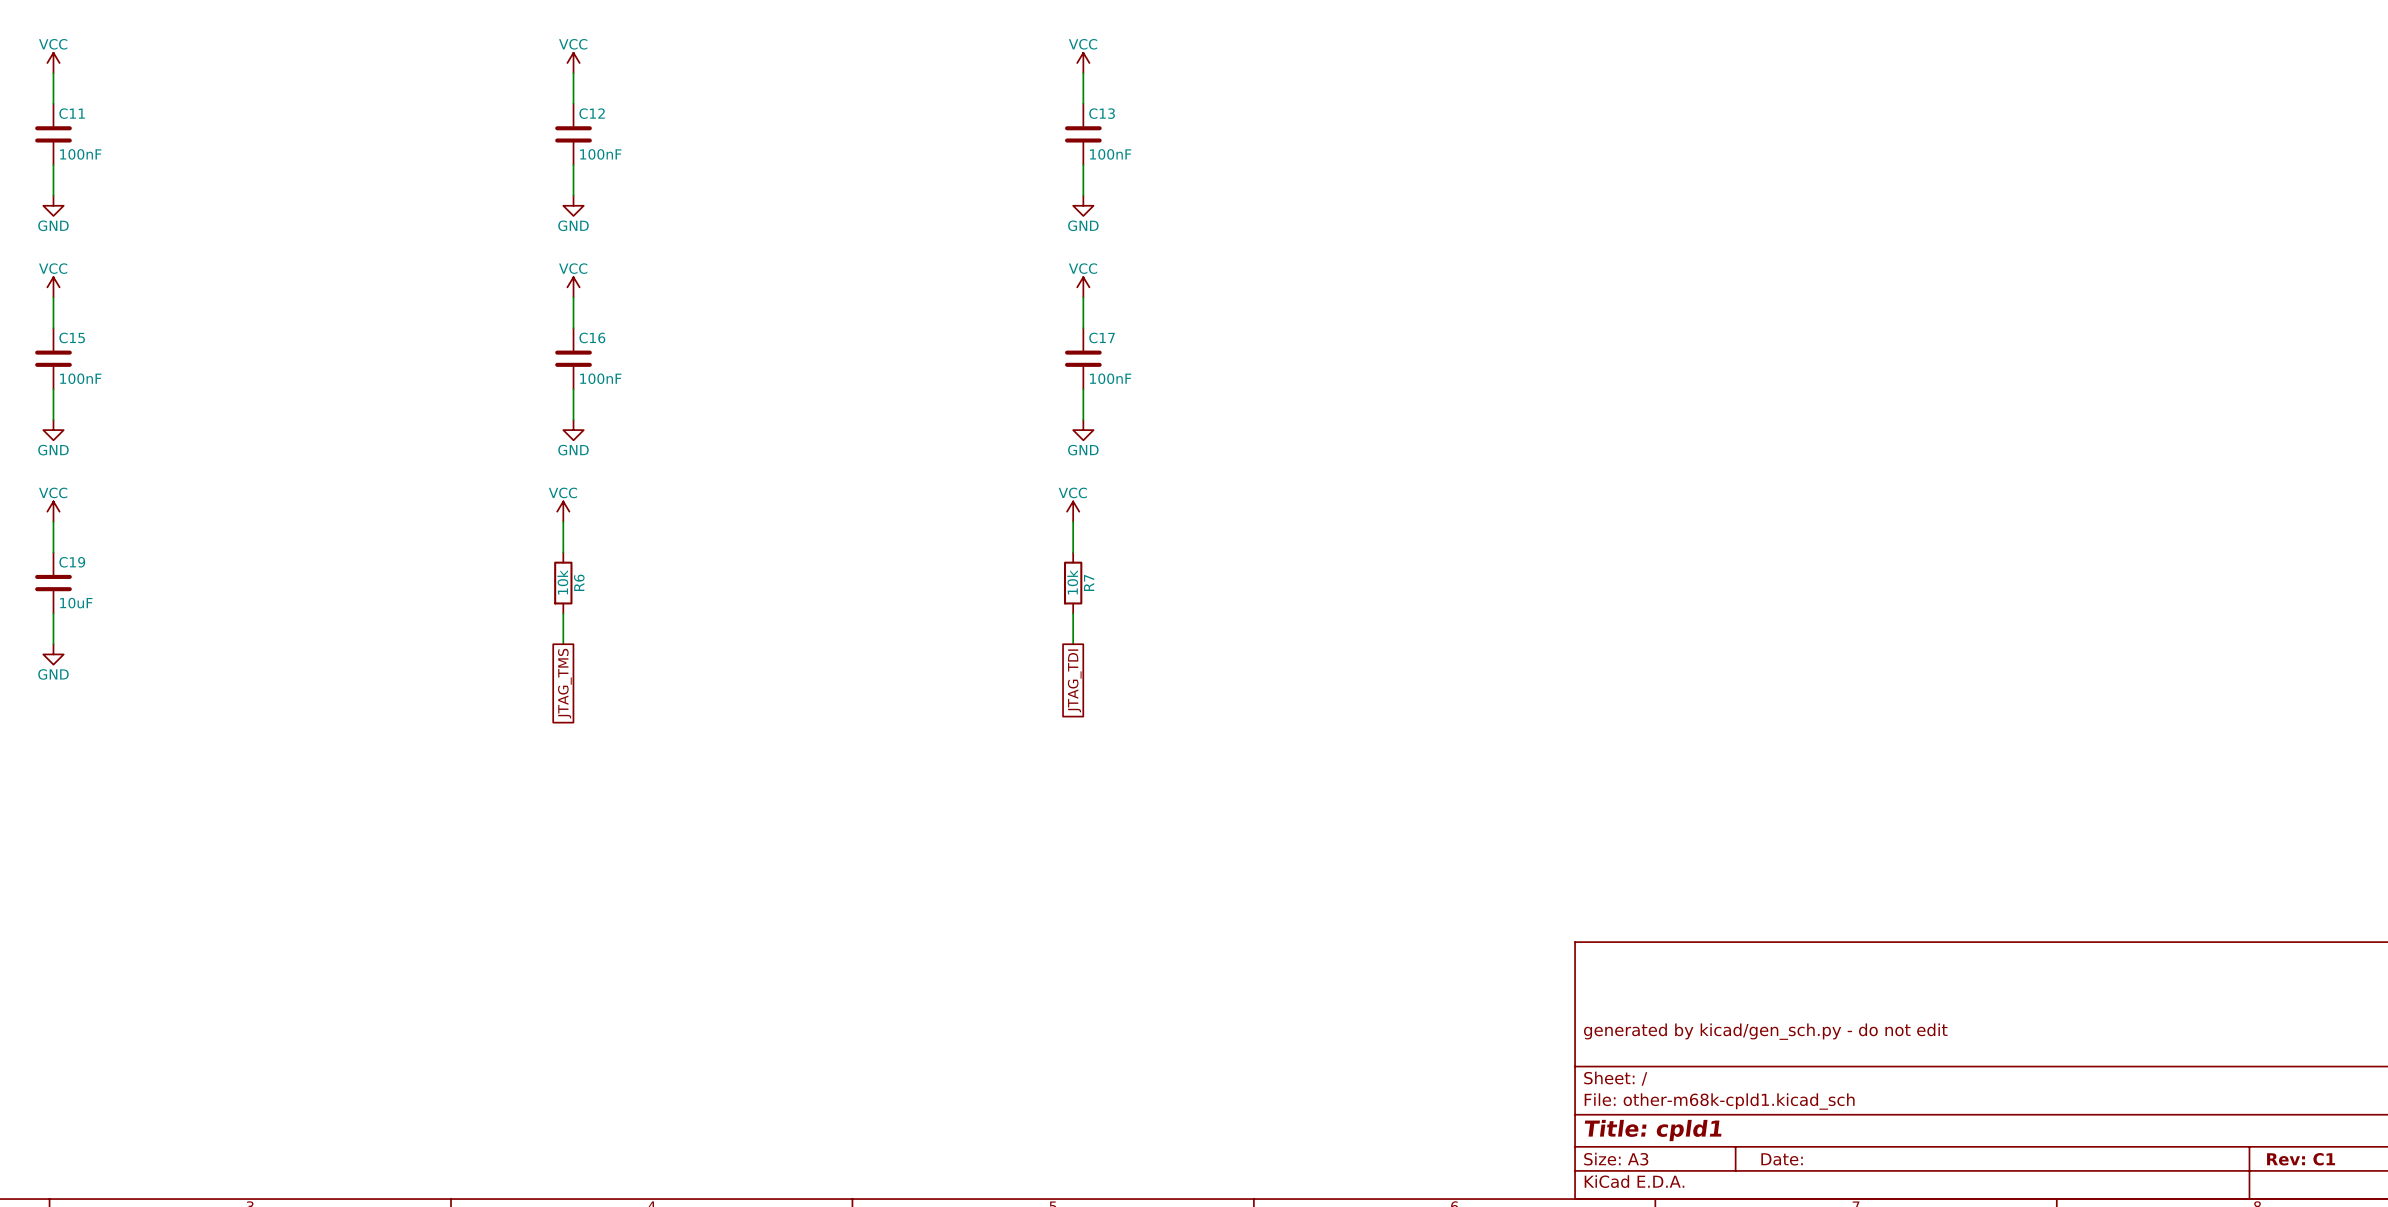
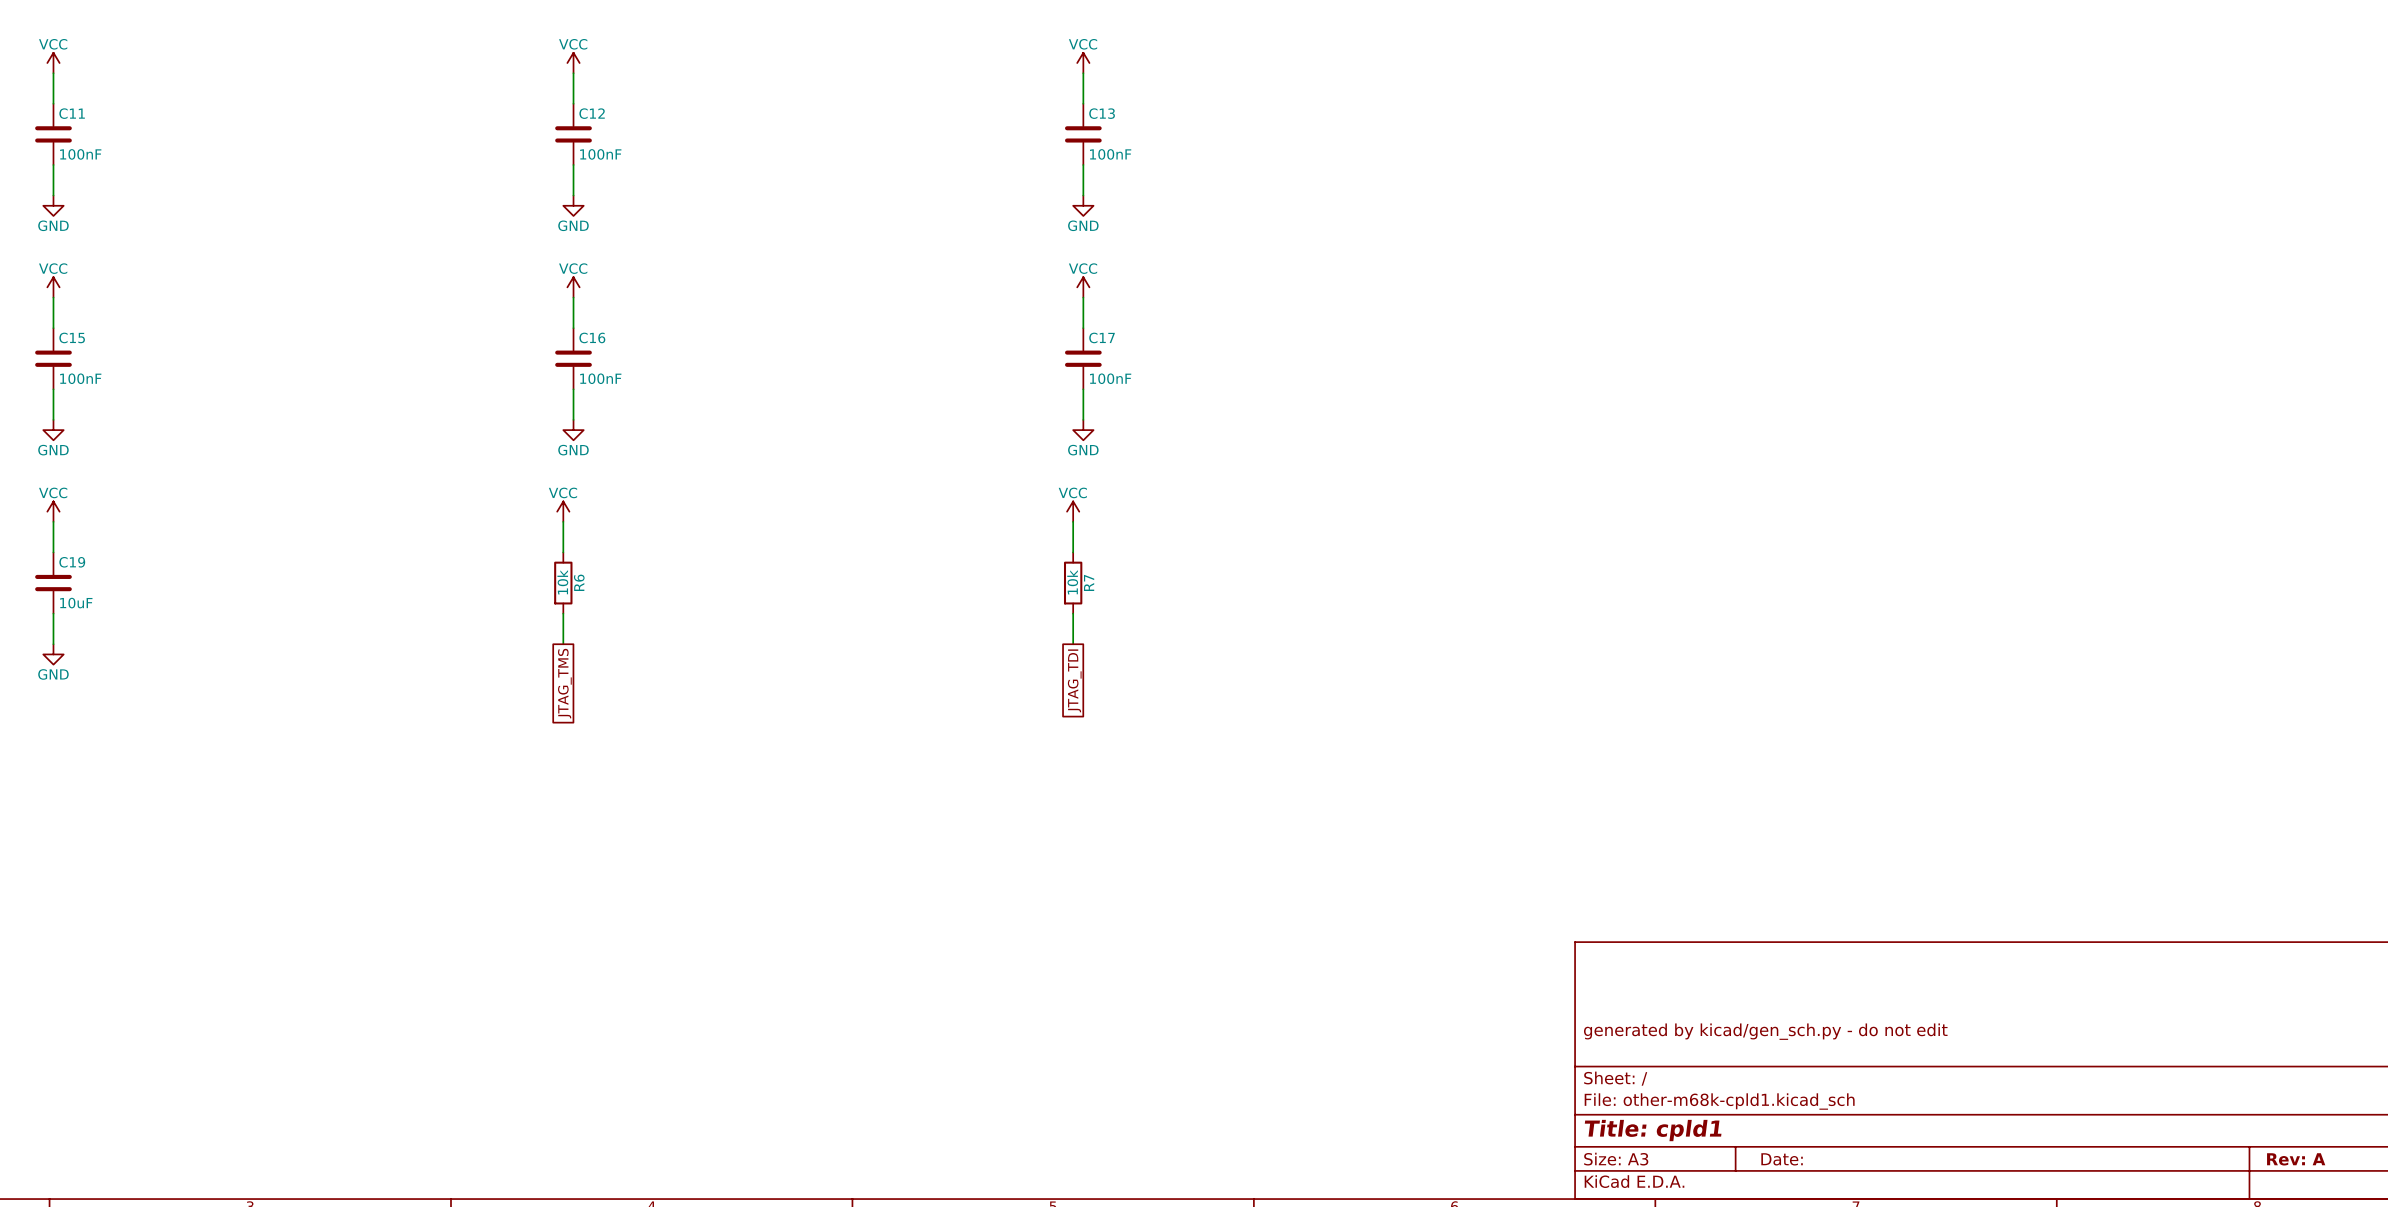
title block: Rev: C1 (2301, 1159) -> Rev: A (2296, 1159)

